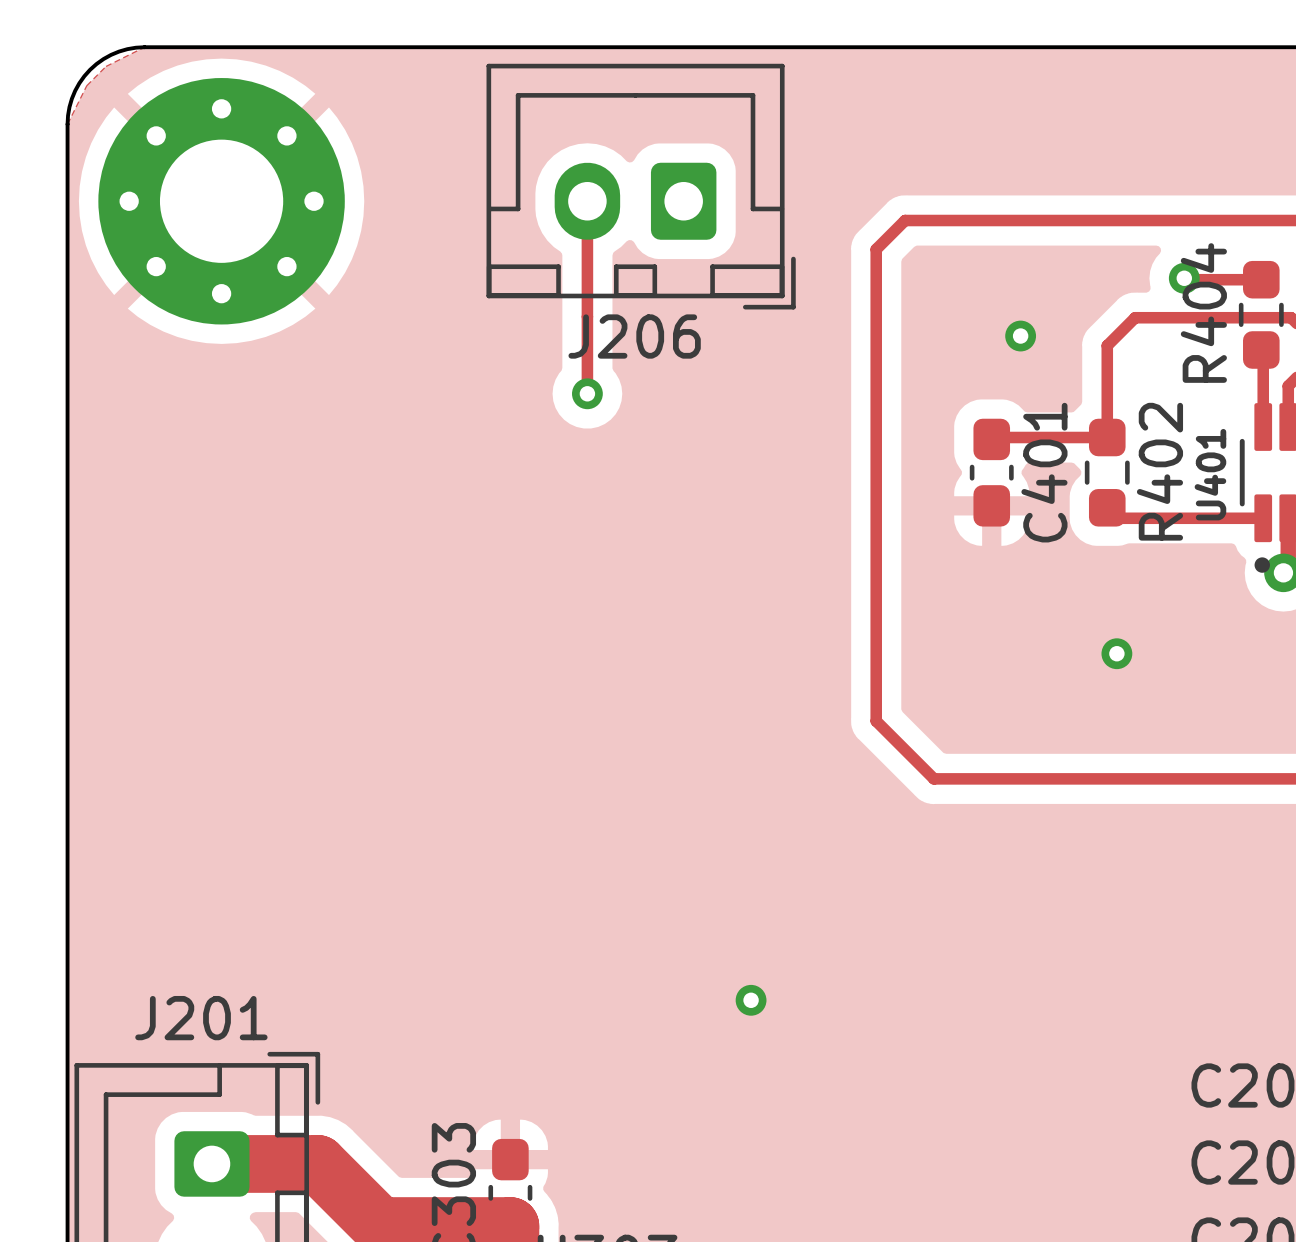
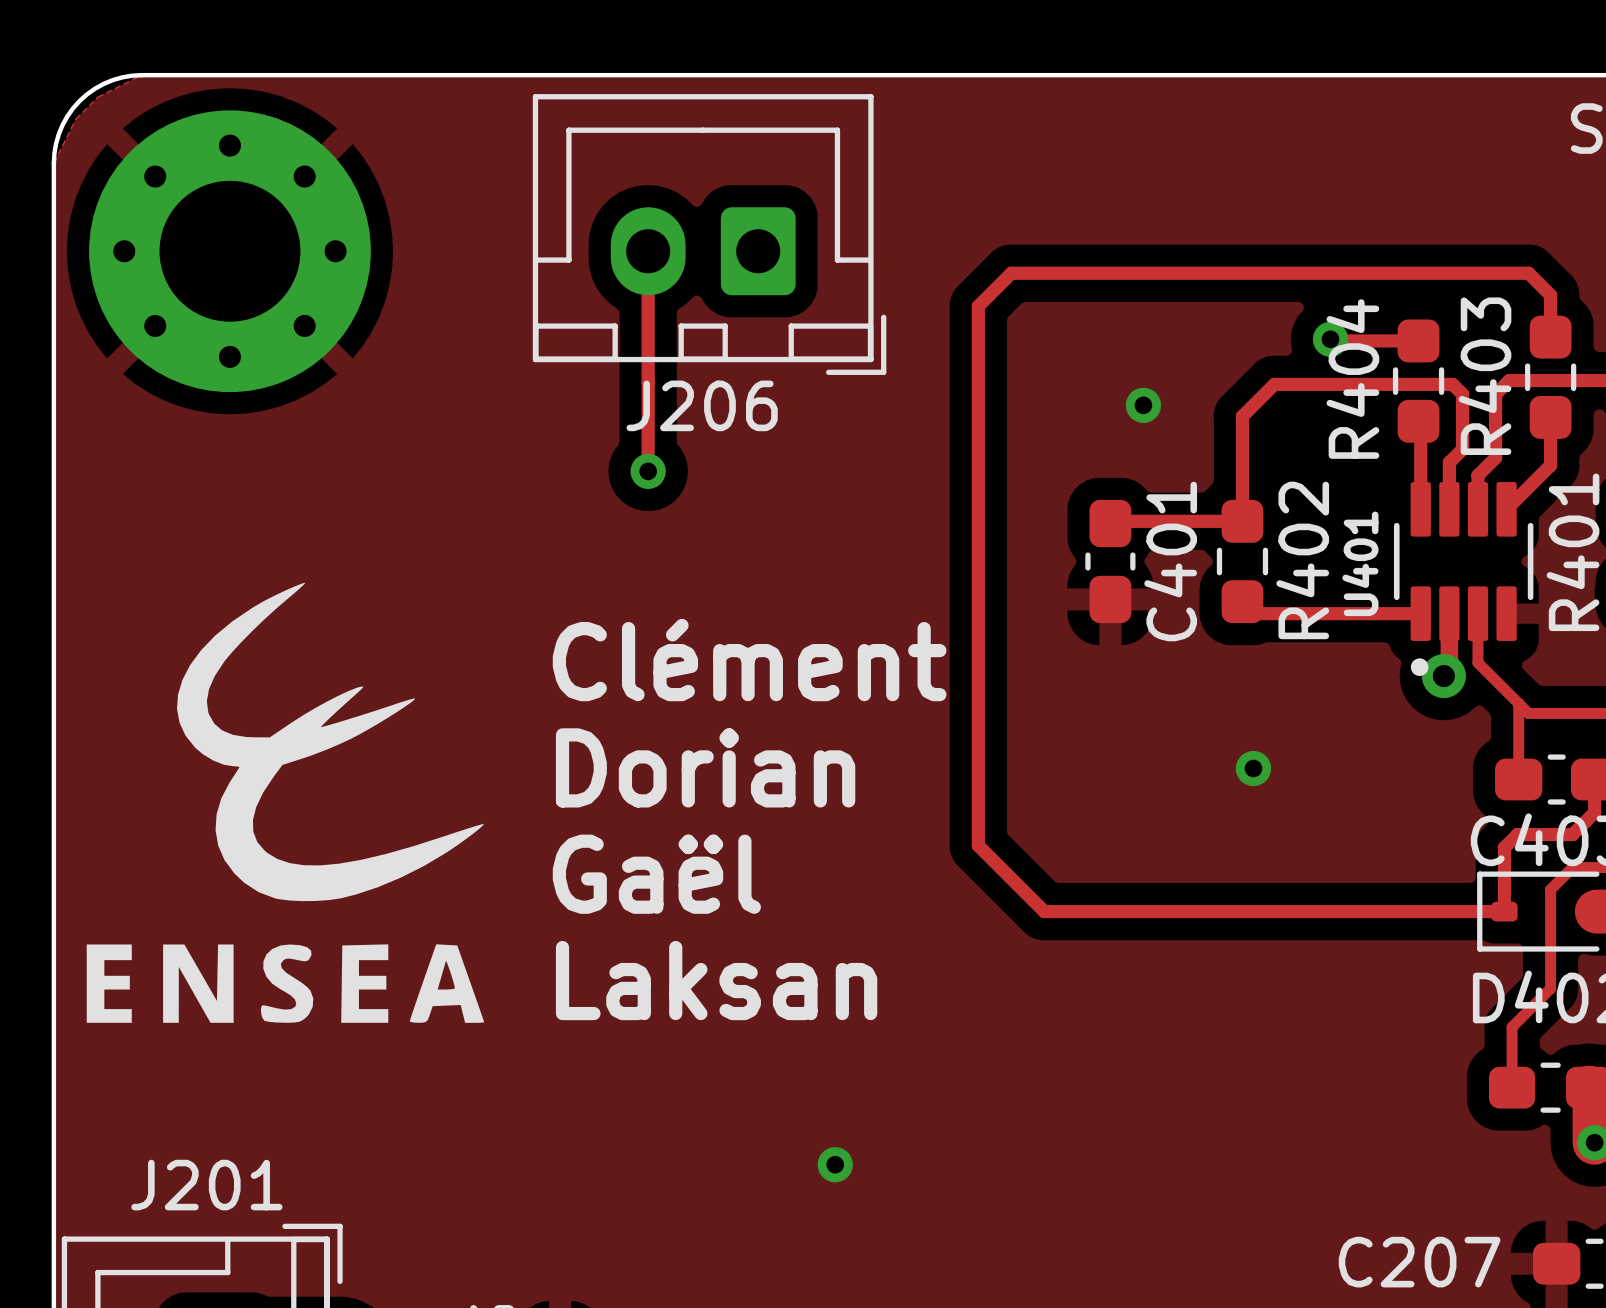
drawing: none -> [86, 582, 485, 1023]
text: none -> Clément (749, 660)
text: none -> Dorian (705, 767)
text: none -> Gaël (656, 874)
text: none -> Laksan (716, 980)

